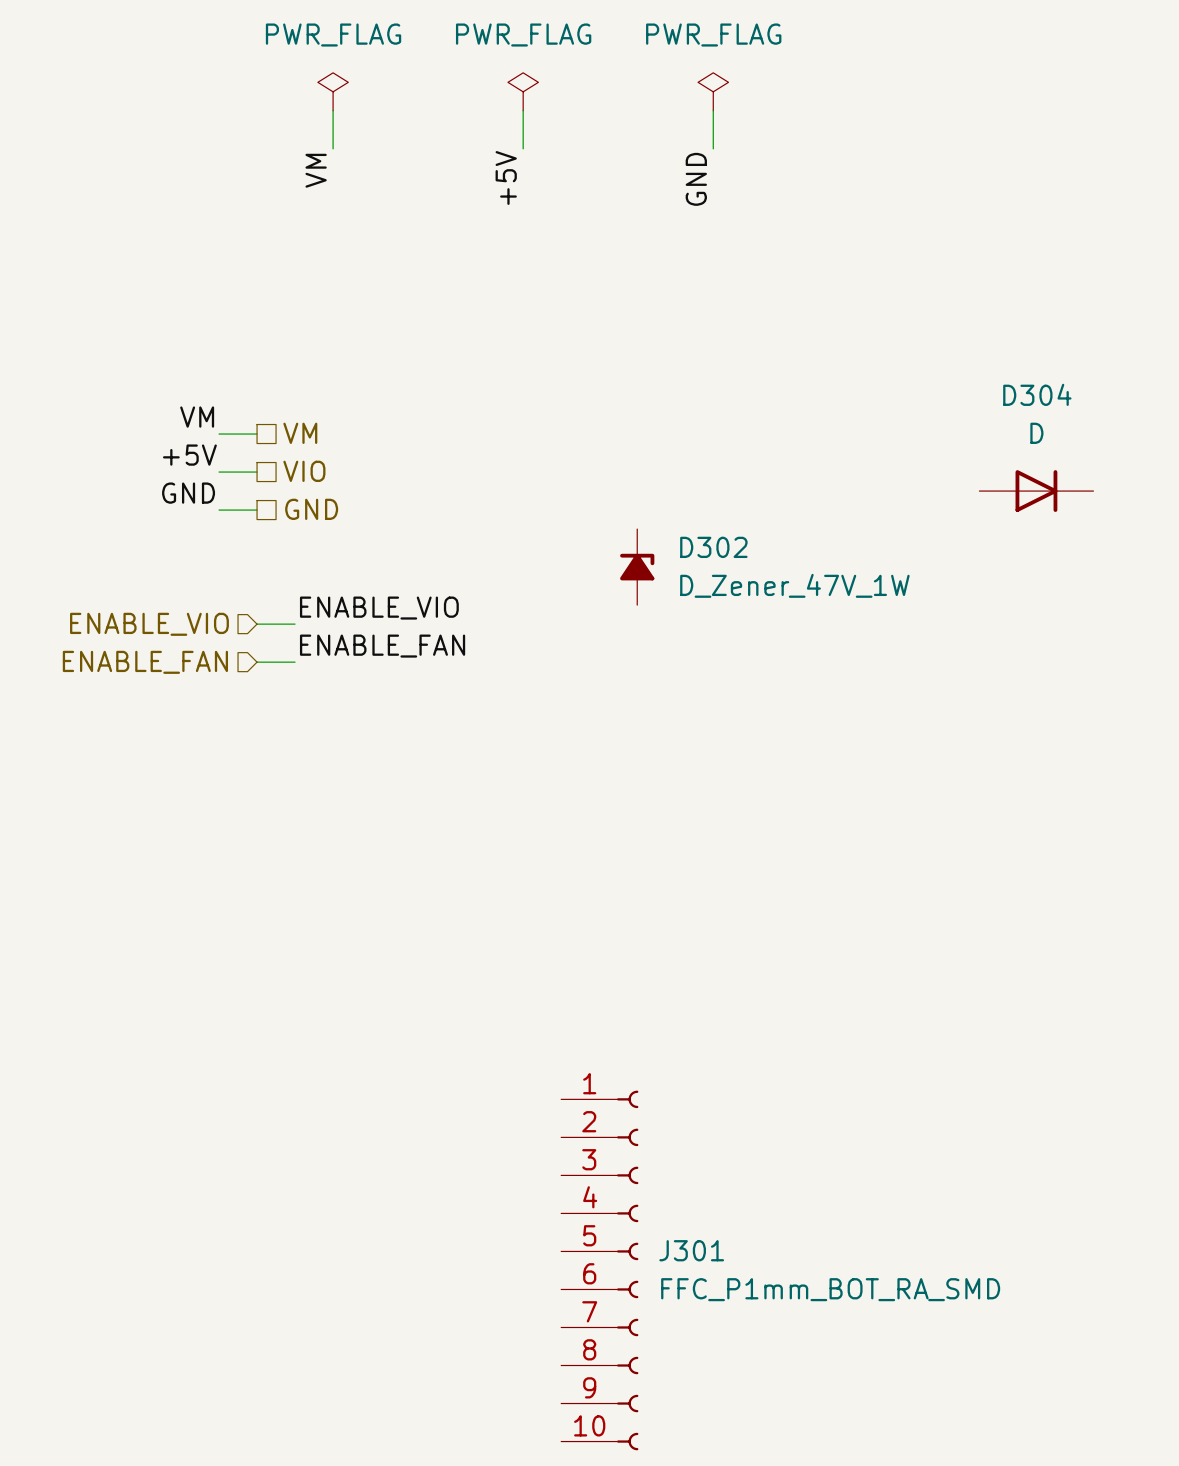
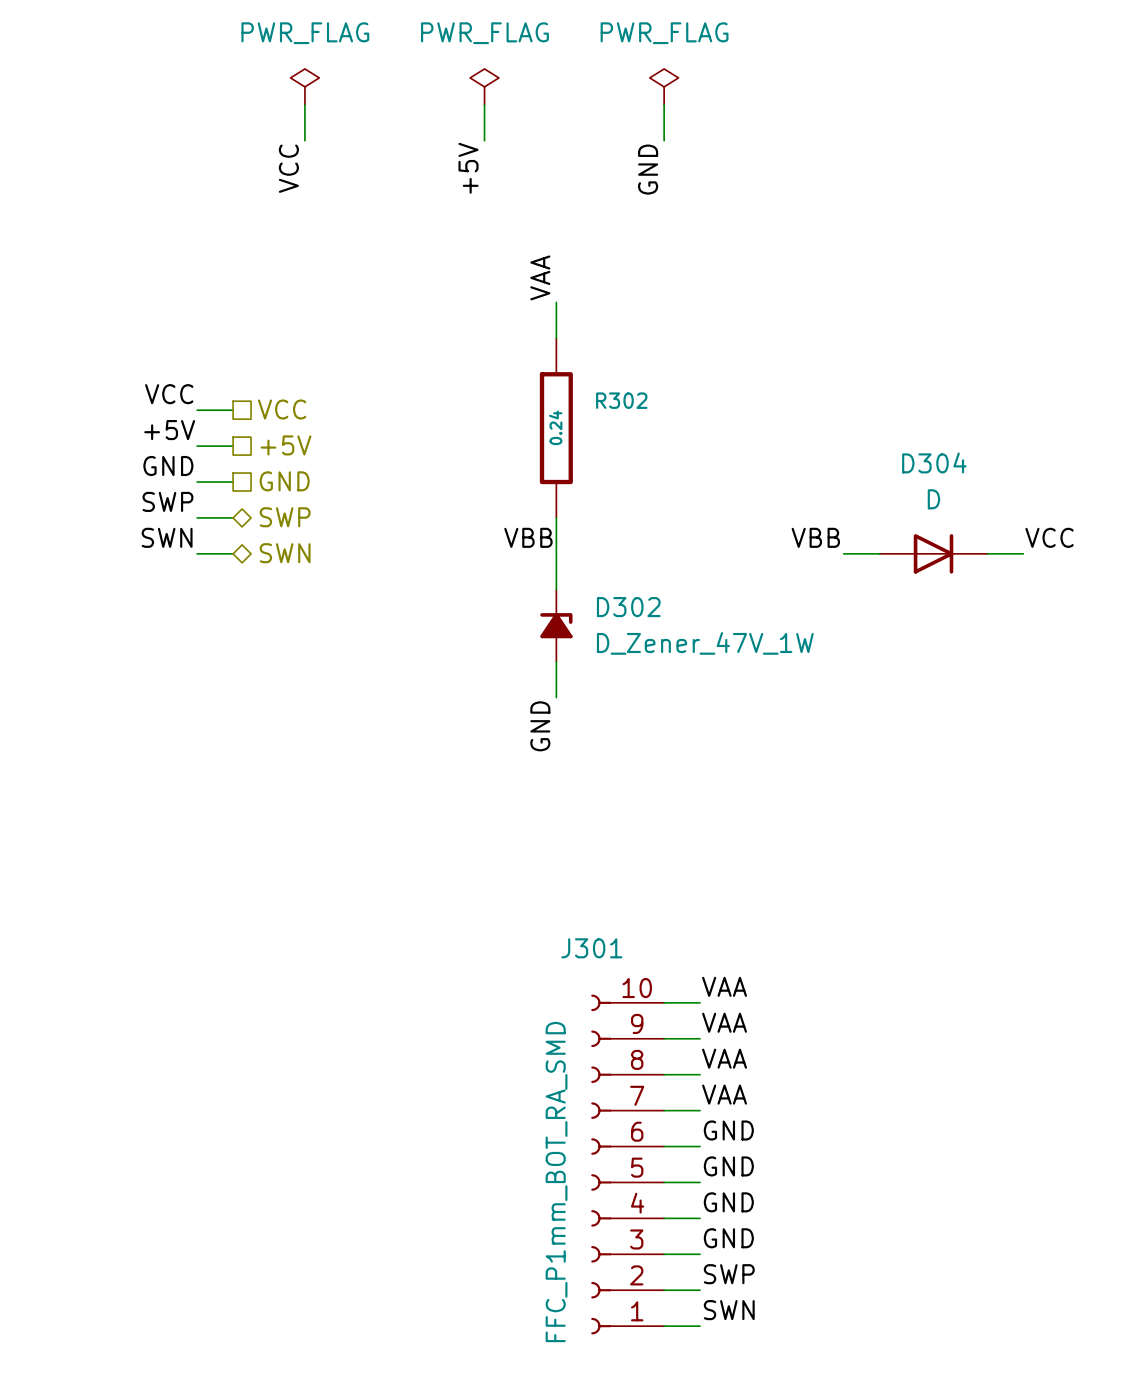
label: VM (316, 170) -> VCC (288, 168)
label: none -> VAA (540, 277)
wire: none -> (556, 302) (556, 338)
label: VM (197, 417) -> VCC (169, 394)
hierarchical label: VM (300, 433) -> VCC (282, 409)
R302: none -> 0.24 (556, 428)
hierarchical label: VIO (304, 471) -> +5V (285, 445)
D304 position: (1036, 491) -> (933, 553)
label: none -> SWP (167, 501)
hierarchical label: none -> SWP (285, 517)
wire: none -> (556, 517) (556, 589)
D302 position: (637, 567) -> (556, 625)
label: none -> SWN (167, 537)
label: none -> VBB (528, 537)
label: none -> VBB (815, 537)
label: none -> VCC (1049, 537)
hierarchical label: none -> SWN (285, 553)
wire: none -> (843, 553) (879, 553)
wire: none -> (987, 553) (1023, 553)
label: ENABLE_VIO (379, 608) -> none
hierarchical label: ENABLE_VIO (149, 624) -> none
wire: (257, 624) (295, 624) -> (197, 517) (233, 517)
label: ENABLE_FAN (382, 646) -> none
hierarchical label: ENABLE_FAN (145, 662) -> none
wire: (257, 662) (295, 662) -> (197, 553) (233, 553)
wire: none -> (556, 661) (556, 697)
label: none -> GND (540, 726)
label: none -> VAA (724, 986)
wire: none -> (664, 1002) (700, 1002)
label: none -> VAA (724, 1022)
wire: none -> (664, 1038) (700, 1038)
label: none -> VAA (724, 1058)
wire: none -> (664, 1074) (700, 1074)
label: none -> VAA (724, 1094)
wire: none -> (664, 1110) (700, 1110)
label: none -> GND (728, 1130)
wire: none -> (664, 1146) (700, 1146)
label: none -> GND (728, 1166)
J301 name position: J301 (691, 1250) -> J301 (591, 948)
wire: none -> (664, 1182) (700, 1182)
J301 rotation: 0° (627, 1270) -> 180° (601, 1164)
label: none -> GND (728, 1202)
wire: none -> (664, 1218) (700, 1218)
J301 value position: FFC_P1mm_BOT_RA_SMD (830, 1289) -> FFC_P1mm_BOT_RA_SMD (556, 1182)
label: none -> GND (728, 1238)
wire: none -> (664, 1254) (700, 1254)
label: none -> SWP (729, 1274)
wire: none -> (664, 1290) (700, 1290)
label: none -> SWN (729, 1310)
wire: none -> (664, 1326) (700, 1326)

